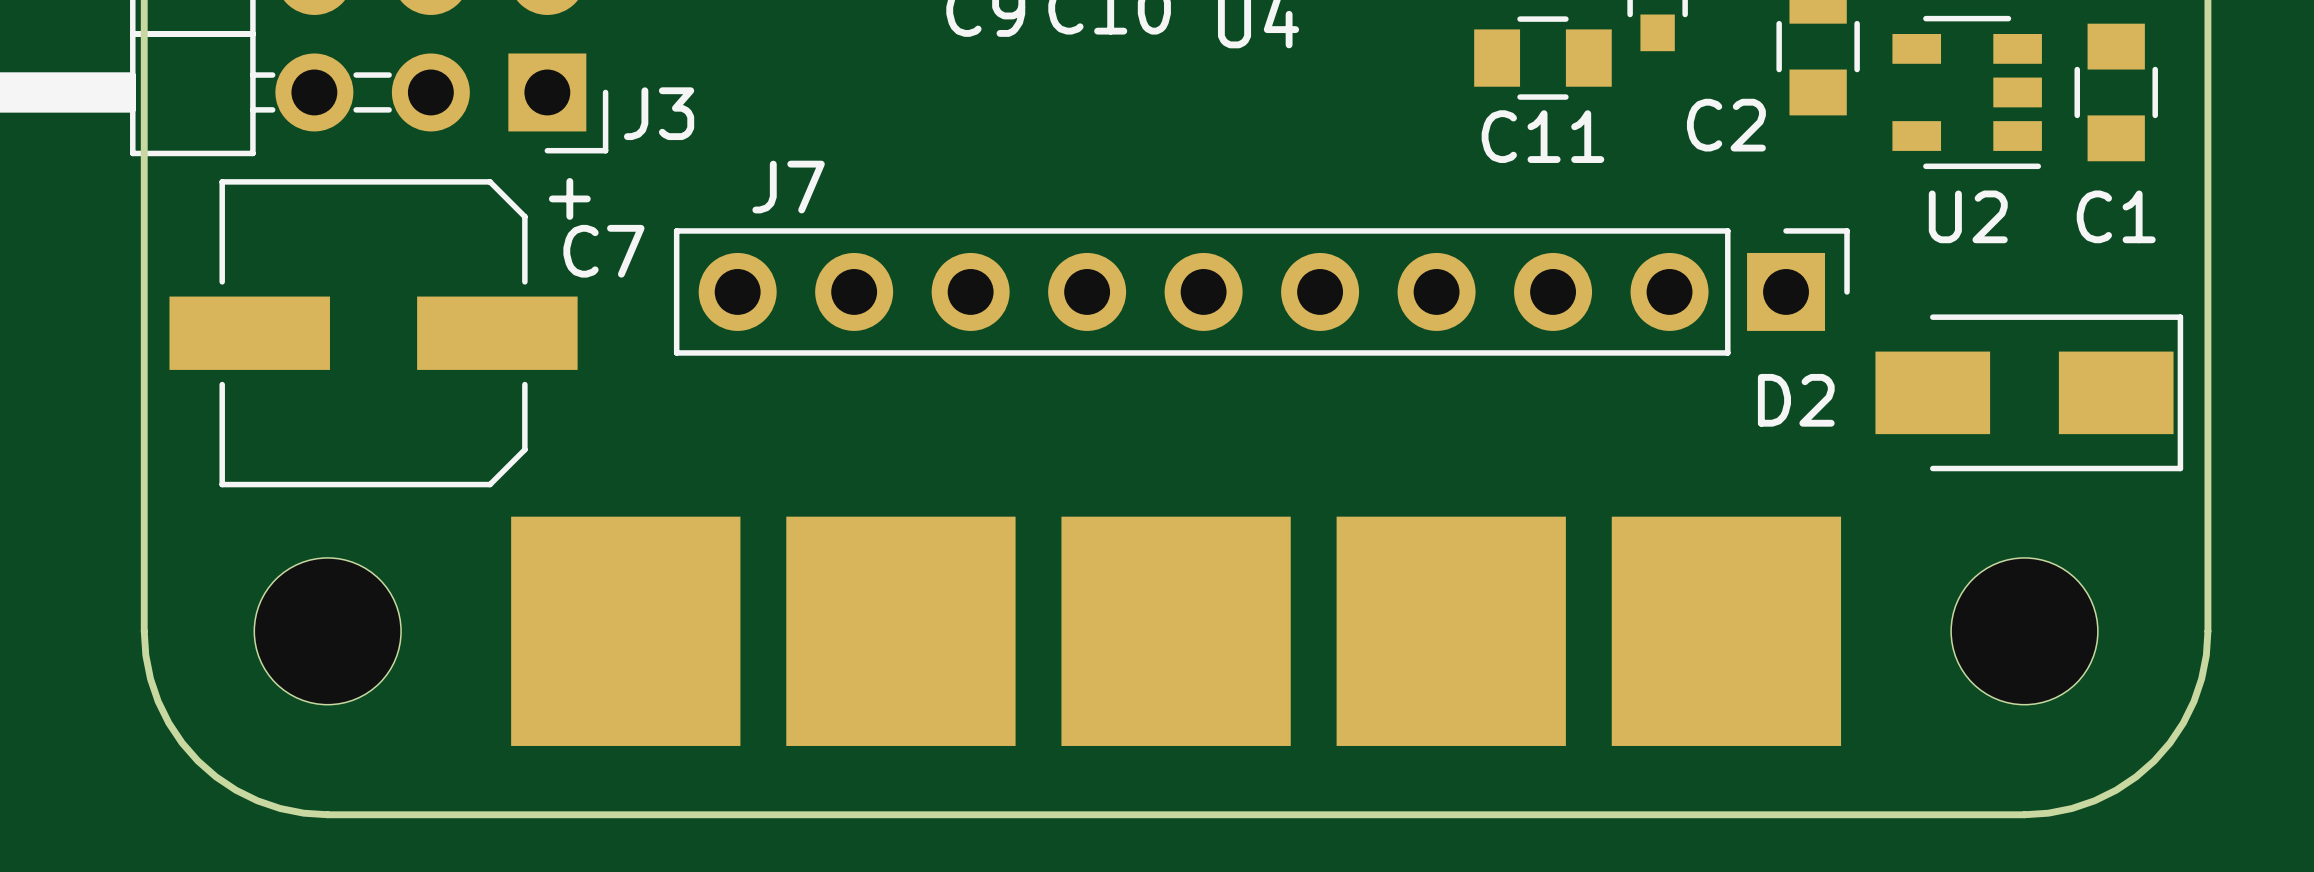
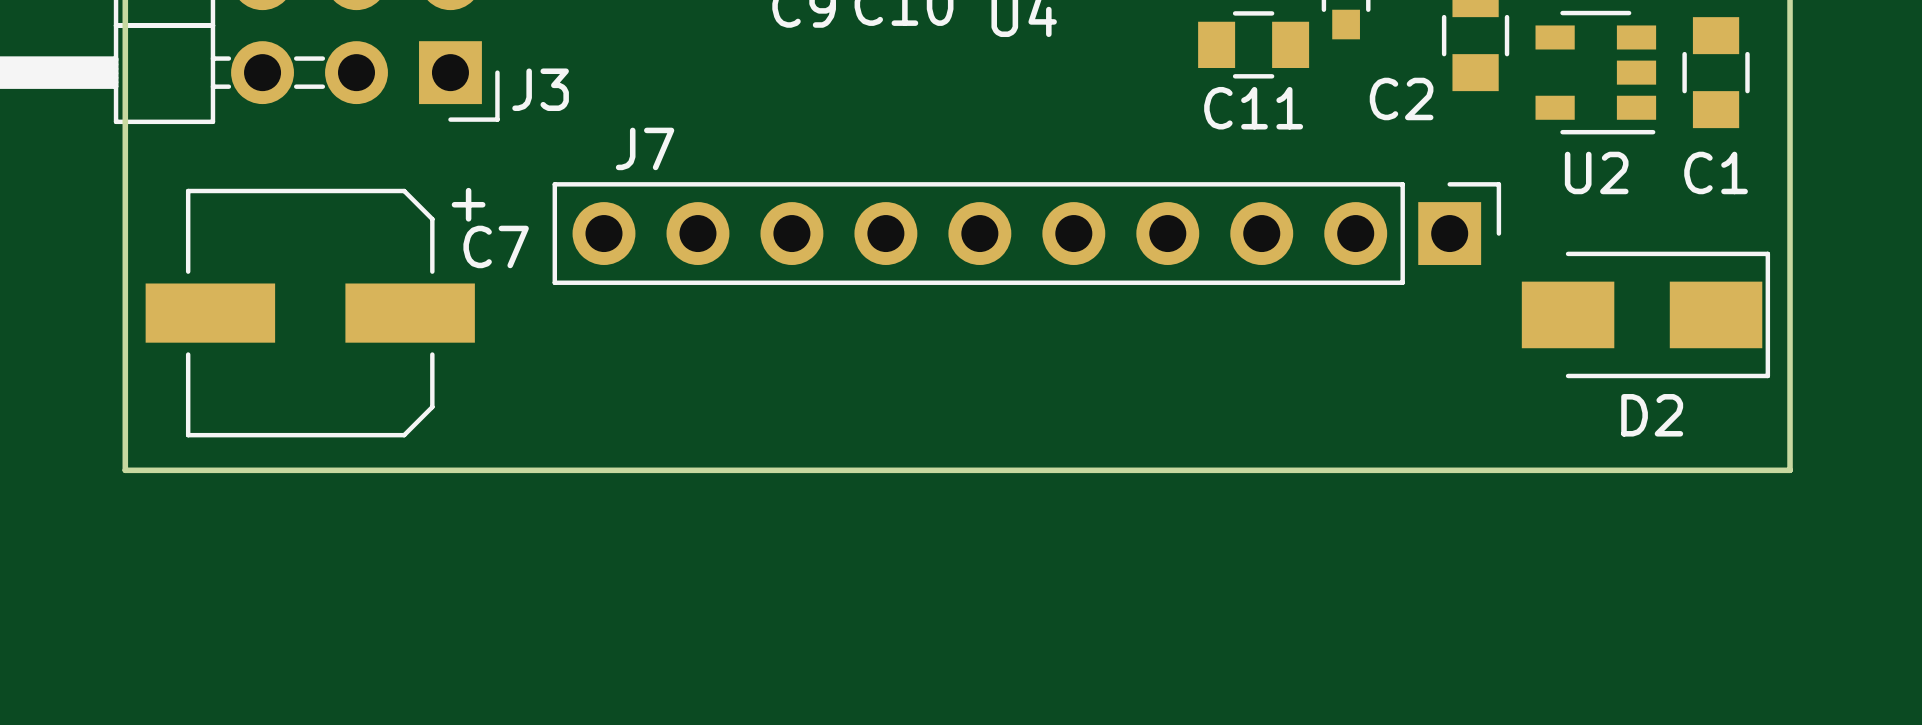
C7 position: (373, 333) -> (310, 313)
D2 name position: D2 (1796, 400) -> D2 (1652, 415)
board edge: (144, 585) (145, 655) (150, 678) (158, 701) (168, 723) (182, 742) (197, 761) (216, 776) (235, 790) (257, 800) (280, 808) (303, 813) (327, 814) (2024, 814) (2048, 813) (2071, 808) (2094, 800) (2116, 790) (2136, 776) (2154, 761) (2170, 742) (2183, 723) (2193, 701) (2201, 678) (2206, 655) (2207, 585) -> (125, 470) (1790, 470)
part: (327, 631) -> none
part: (625, 631) -> none
part: (900, 631) -> none
part: (1176, 631) -> none
part: (1451, 631) -> none
part: (1726, 631) -> none
part: (2024, 631) -> none

